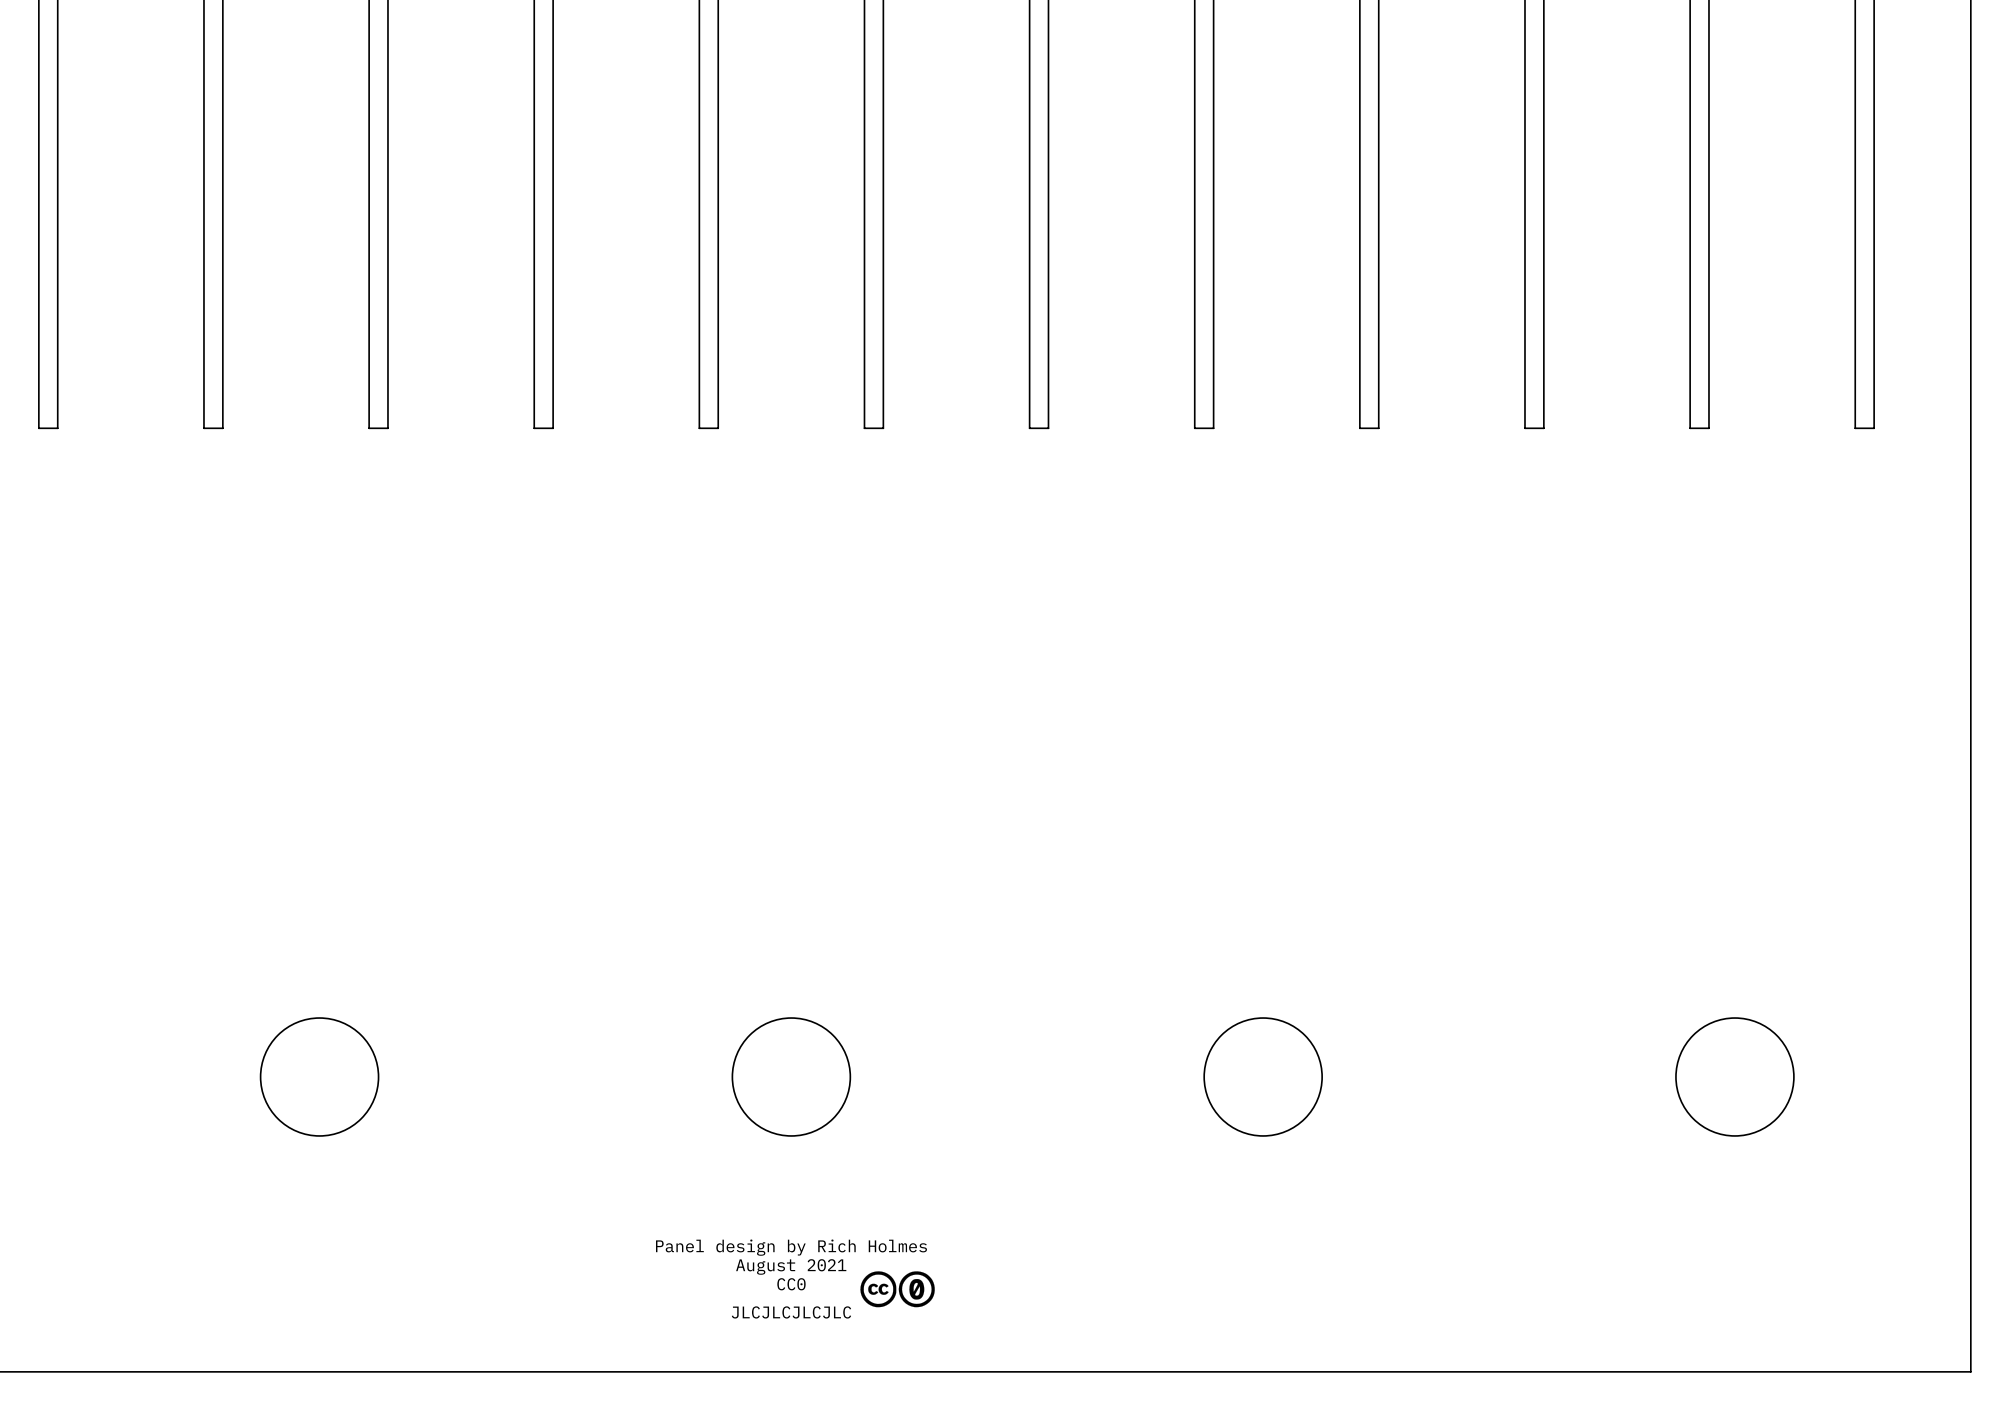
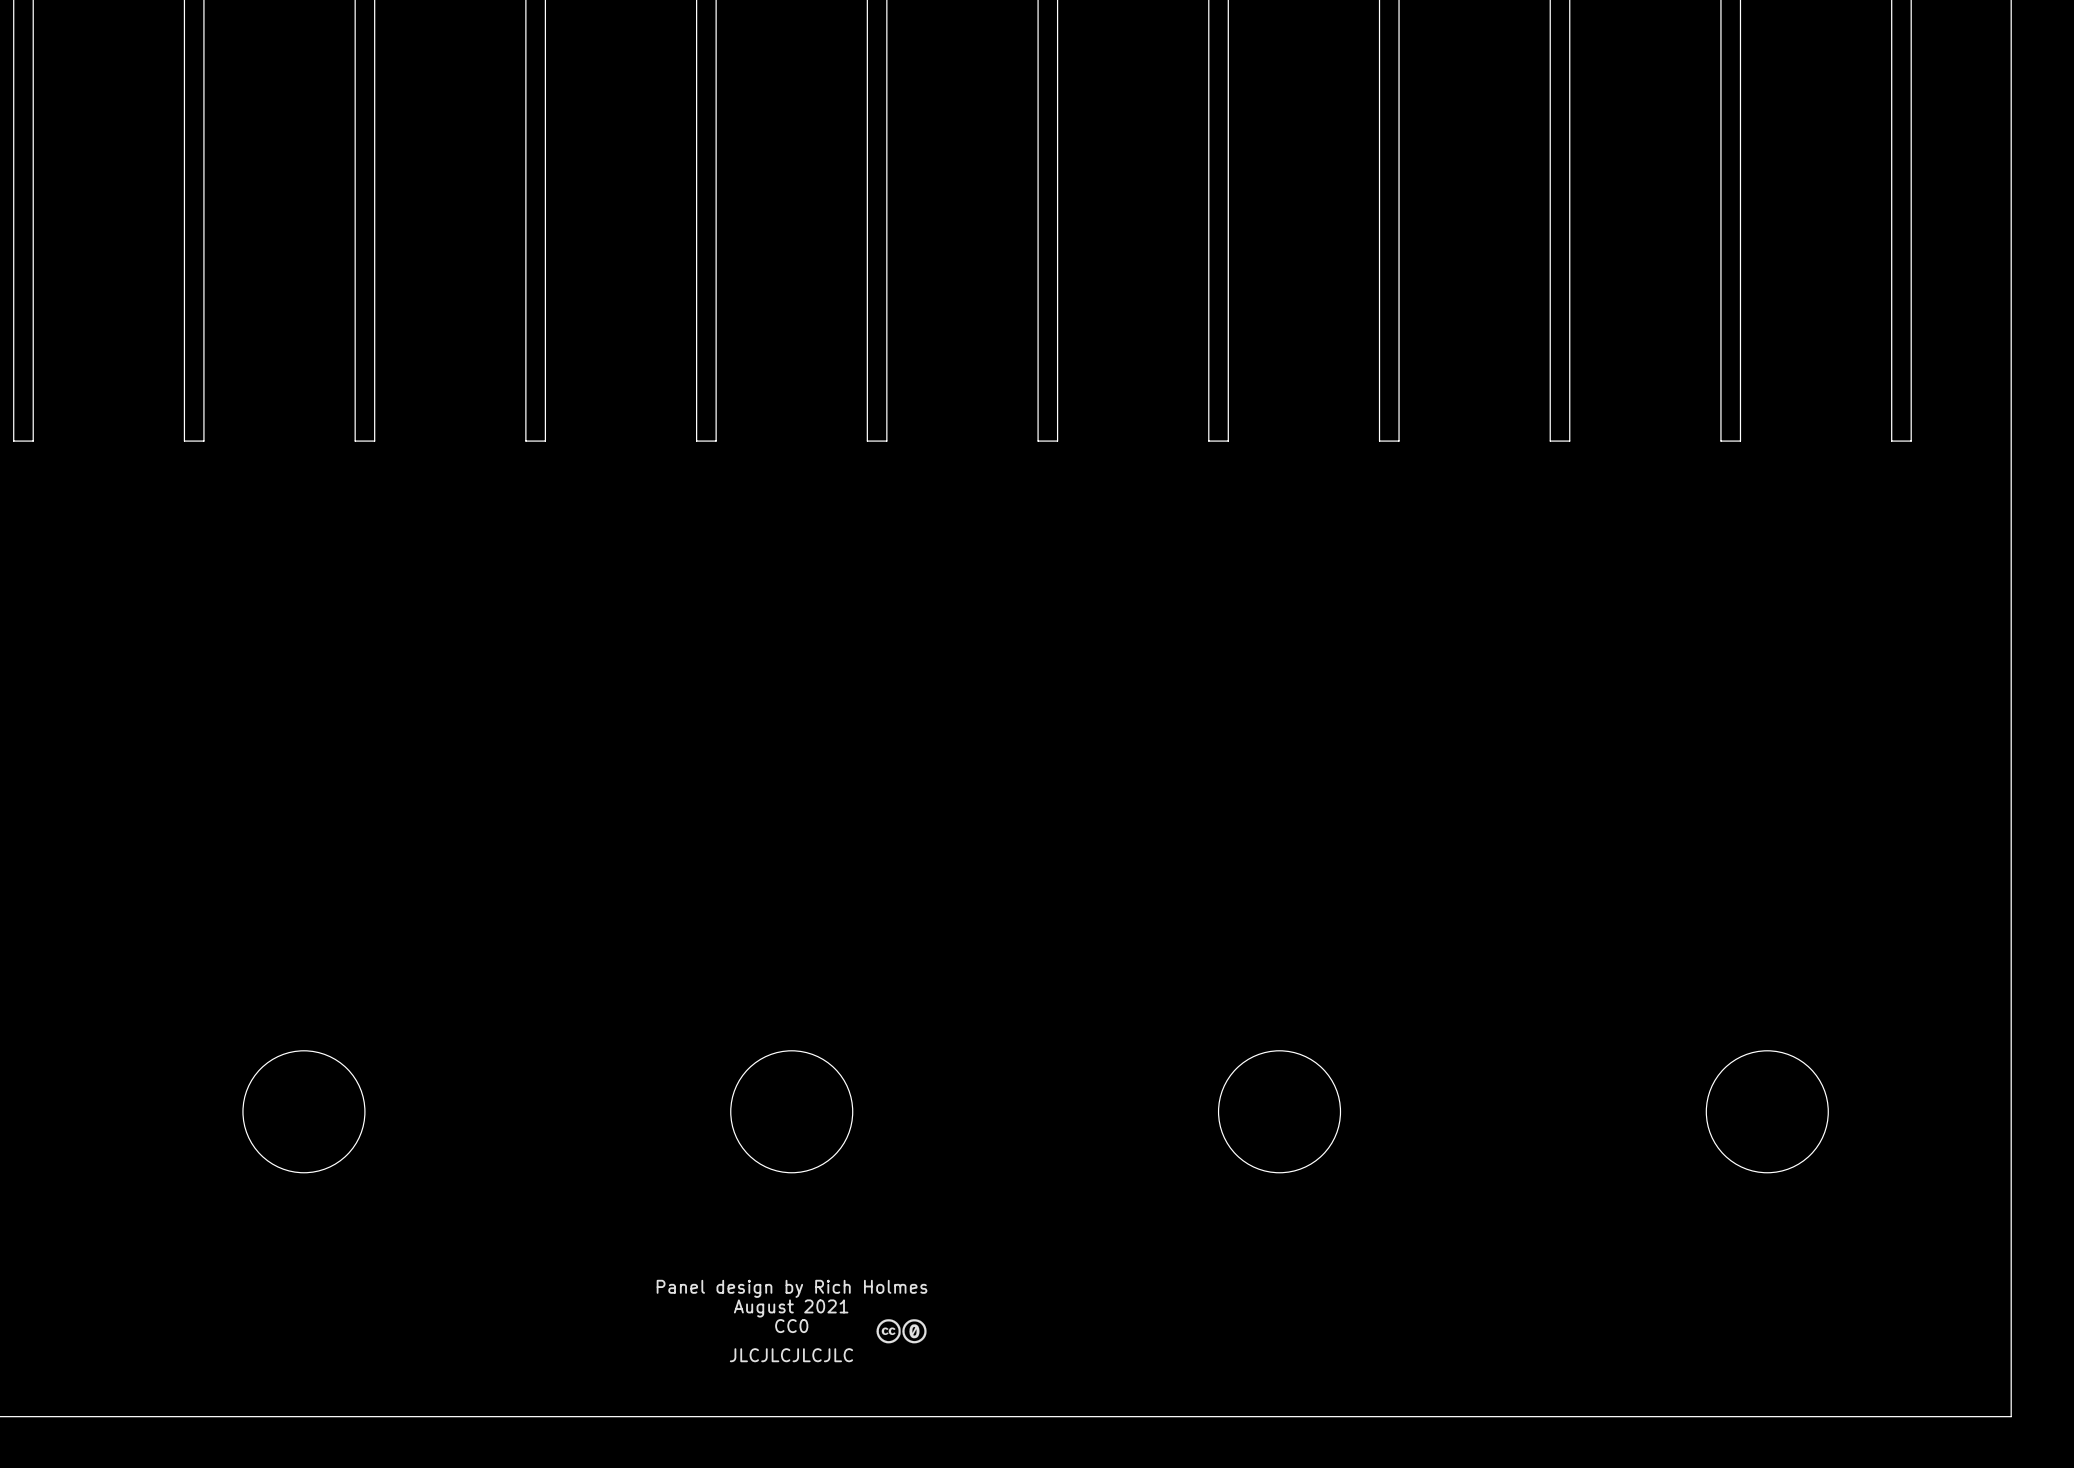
drawing shape: [860, 1271, 935, 1308] -> [876, 1319, 927, 1344]

